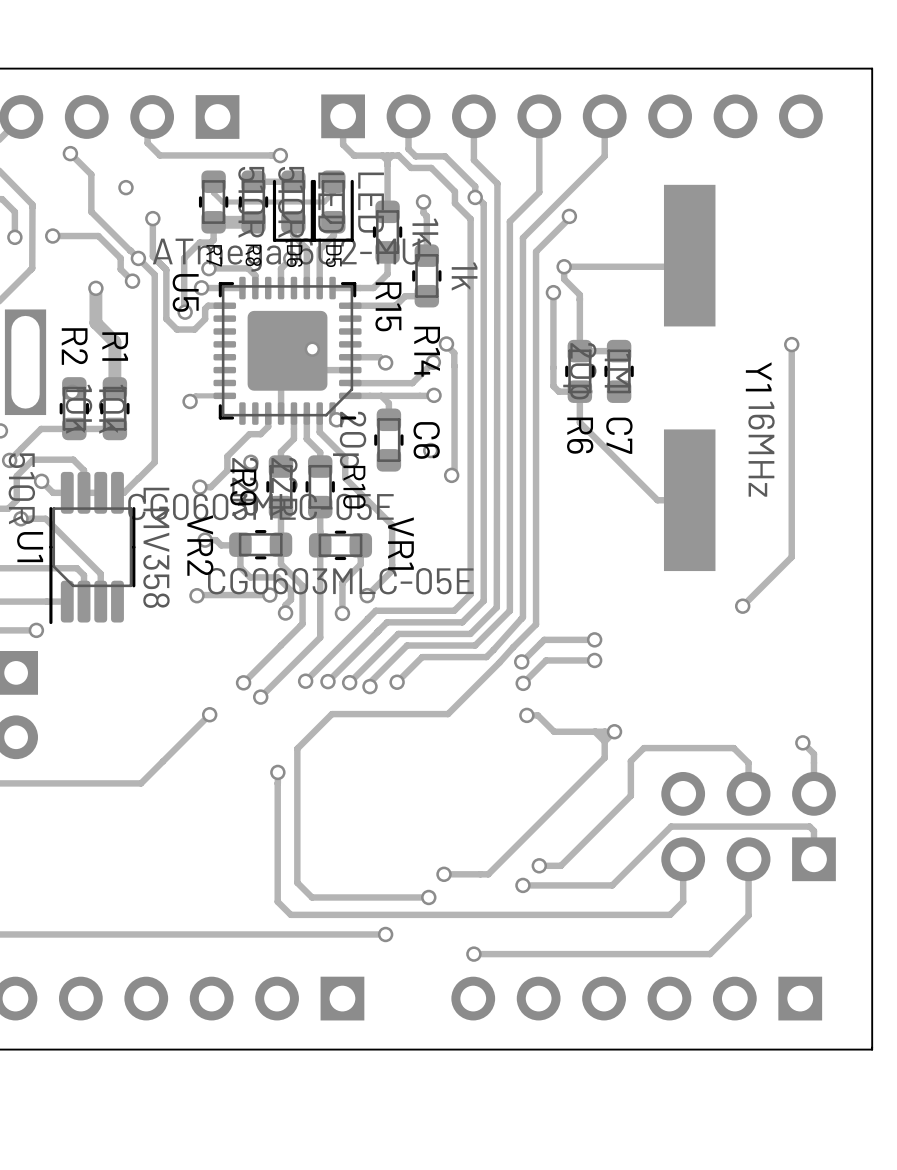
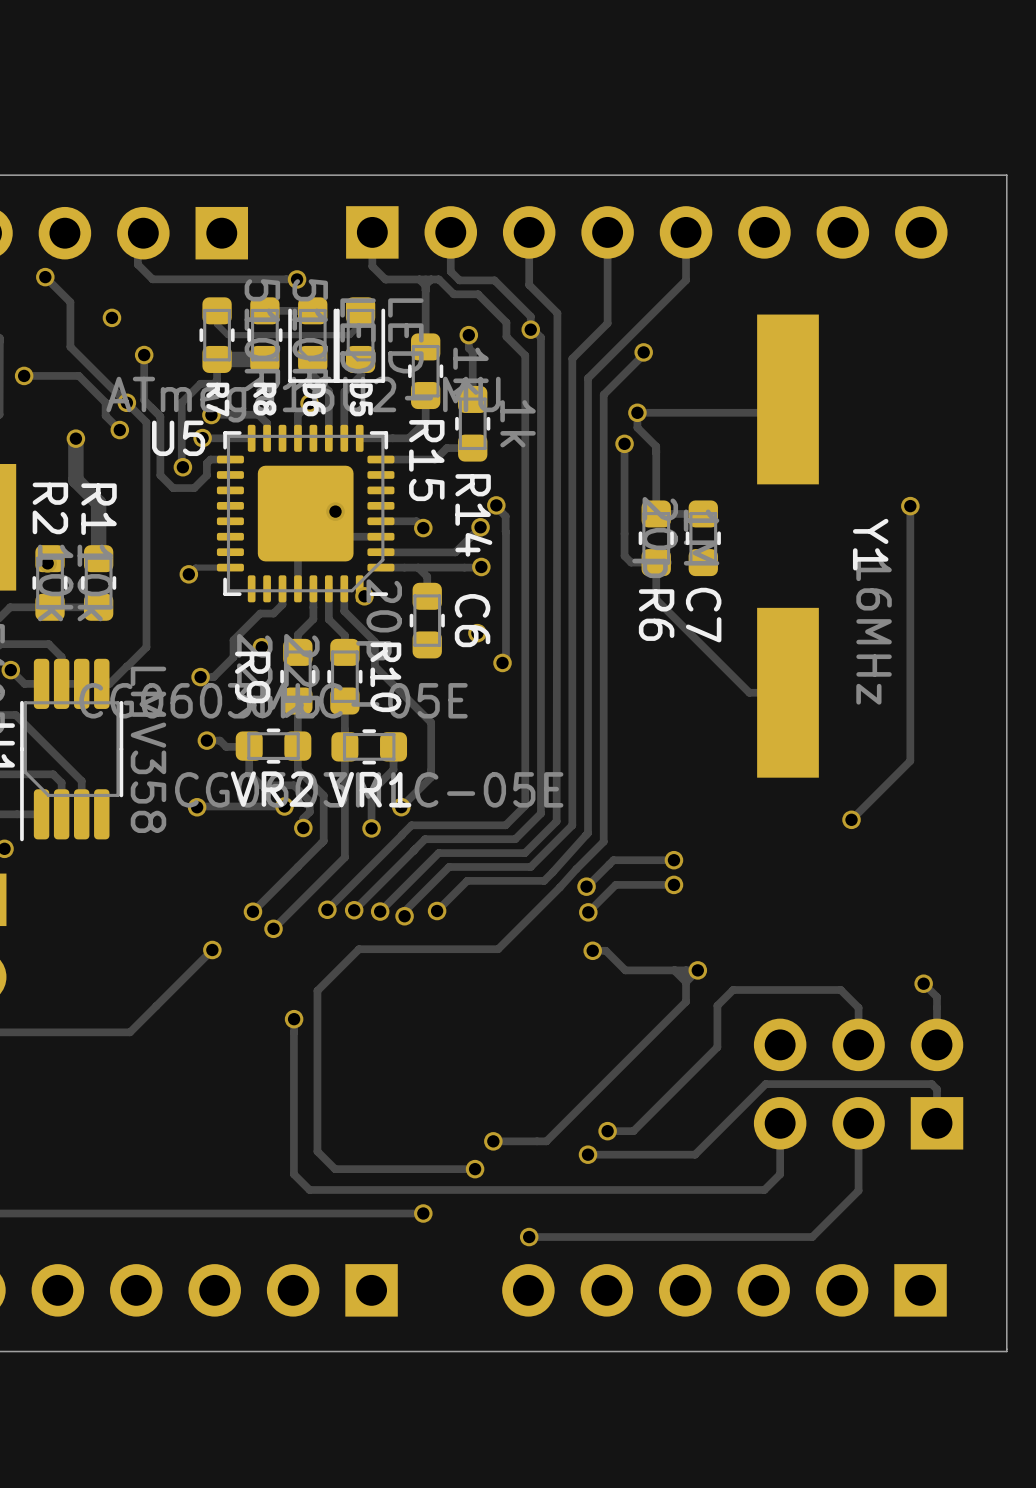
U5 name rotation: 0° (185, 292) -> 90° counterclockwise (178, 438)
VR1 name rotation: 0° (400, 543) -> 90° counterclockwise (370, 789)
VR2 name rotation: 0° (200, 545) -> 90° counterclockwise (272, 789)

